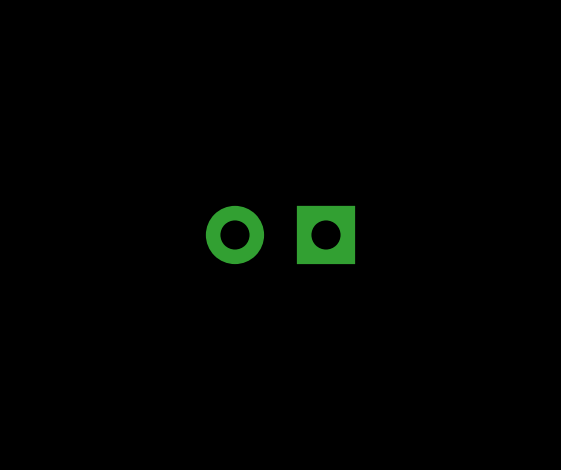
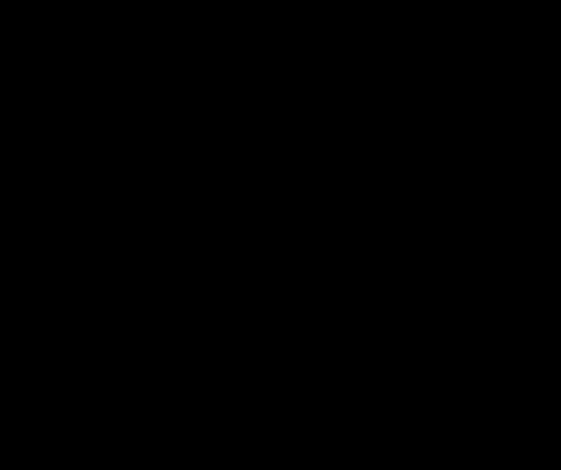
part: (280, 234) -> none

